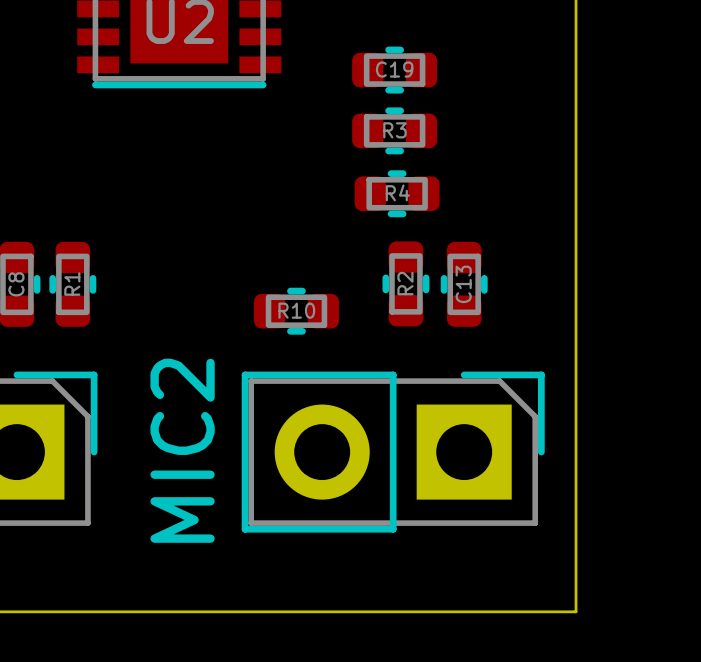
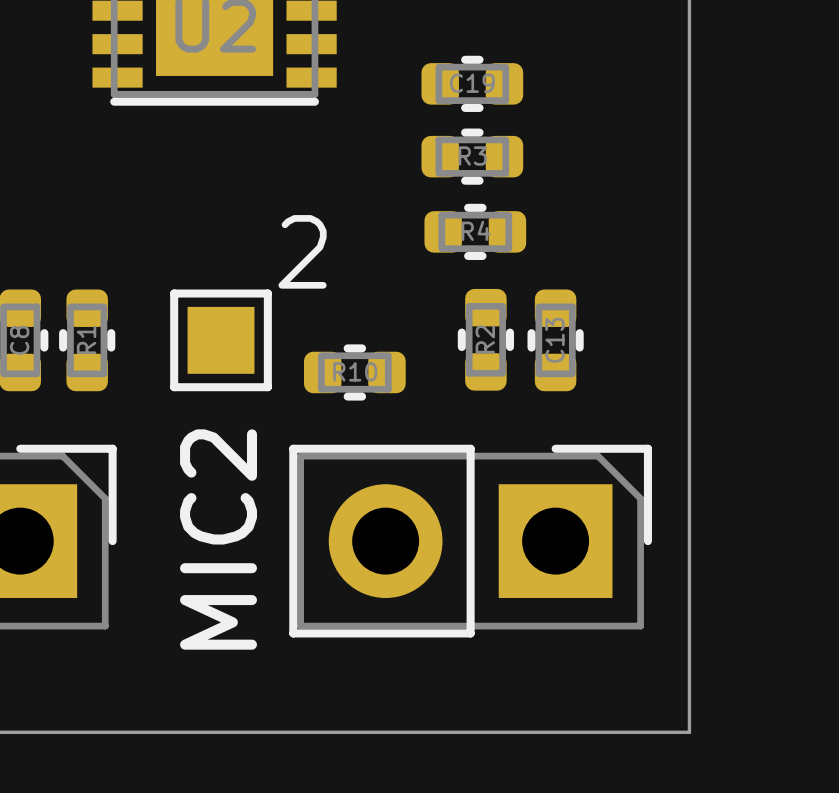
text: none -> 2 (302, 251)
part: none -> (221, 340)

